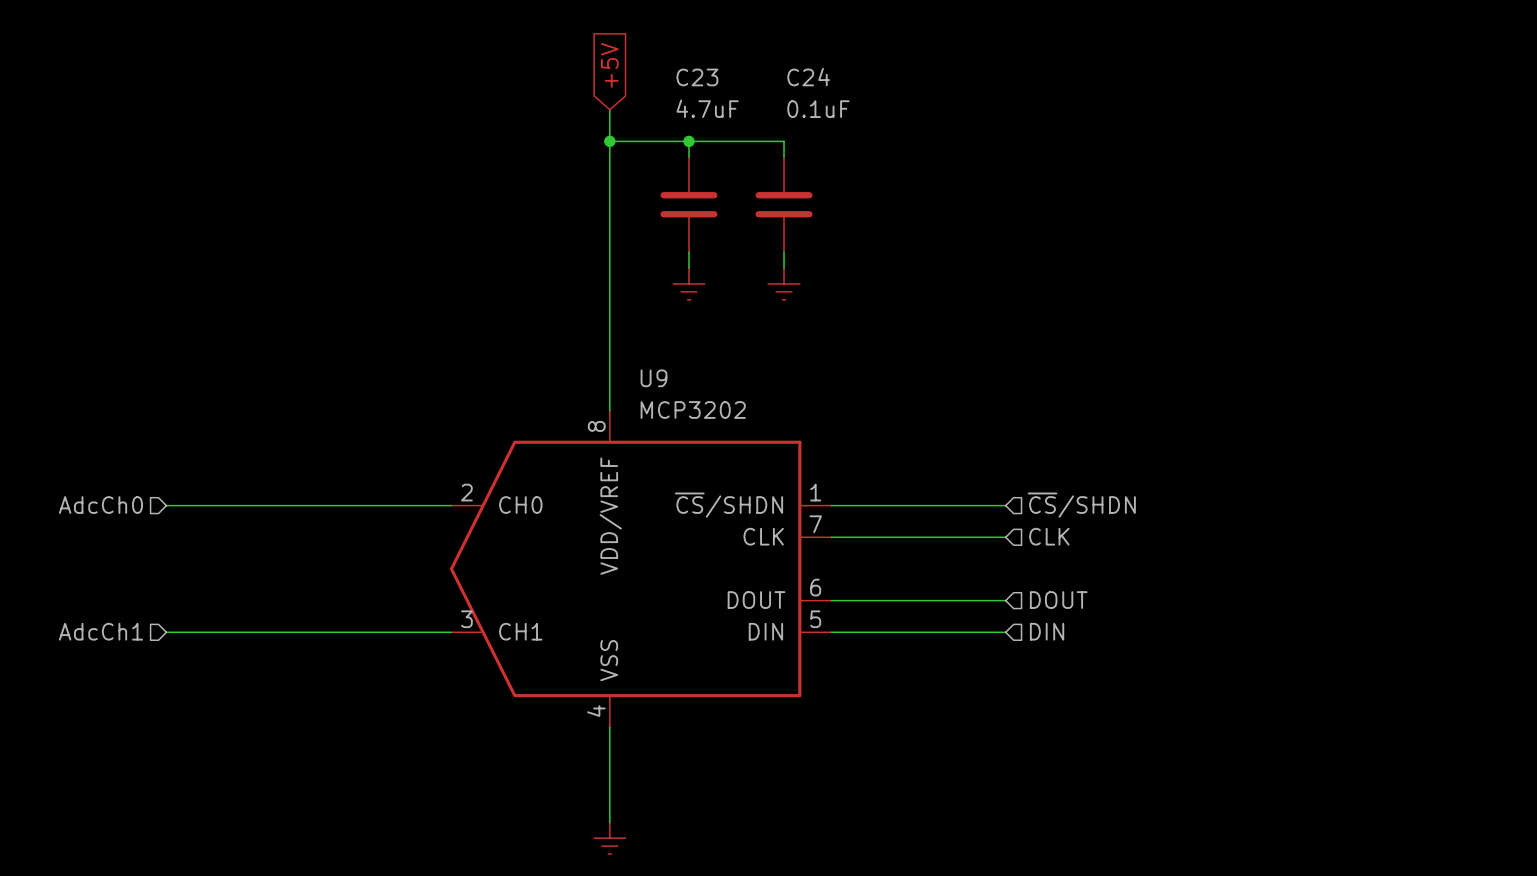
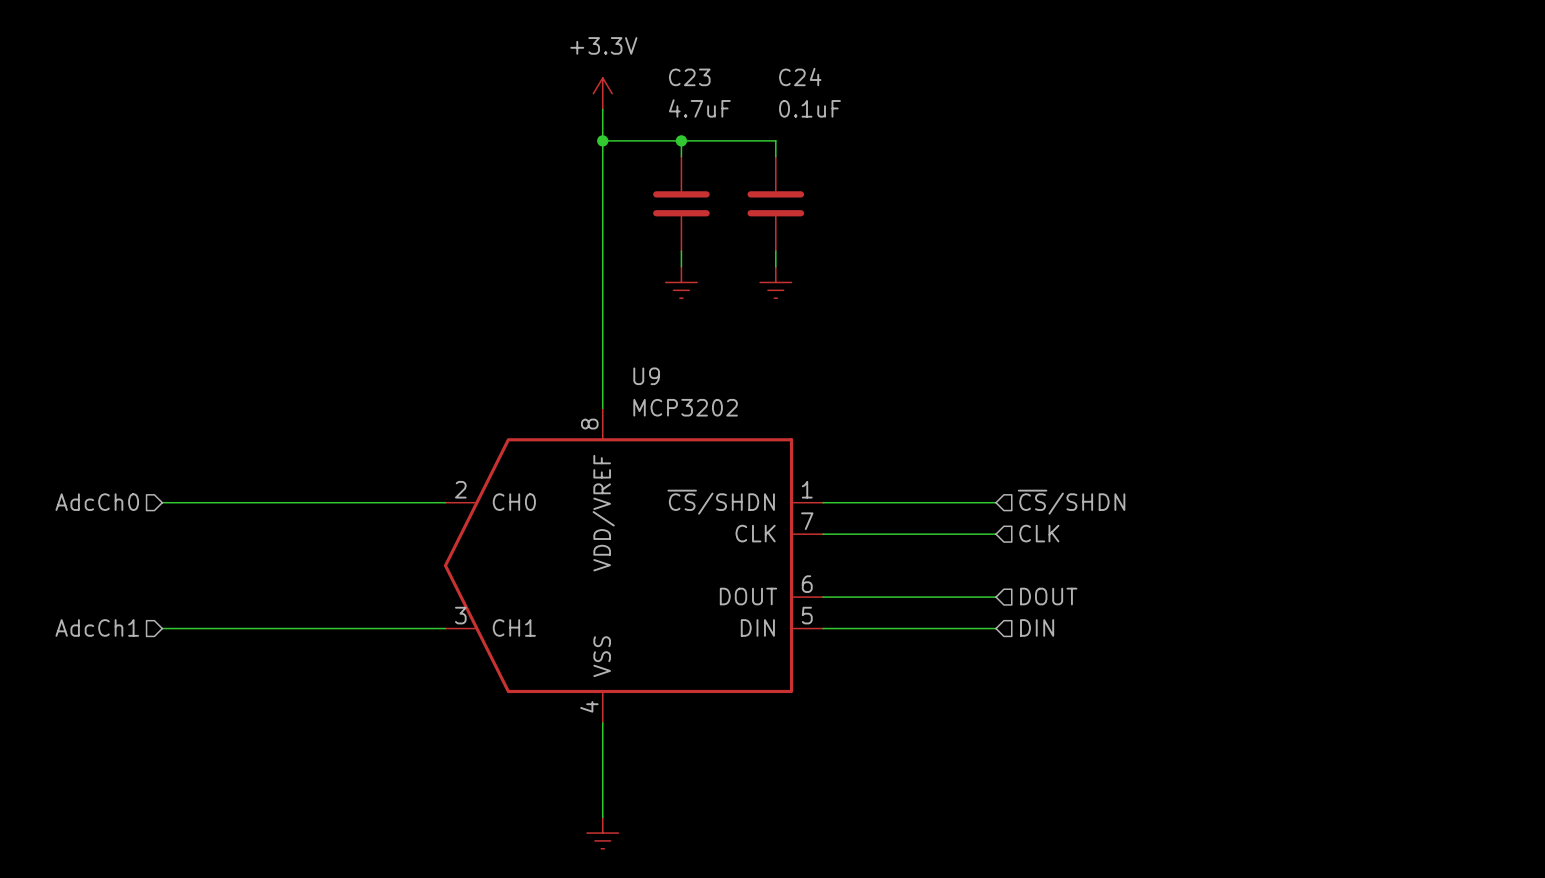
global label: +5V (609, 65) -> none
power symbol: none -> +3.3V (602, 93)

